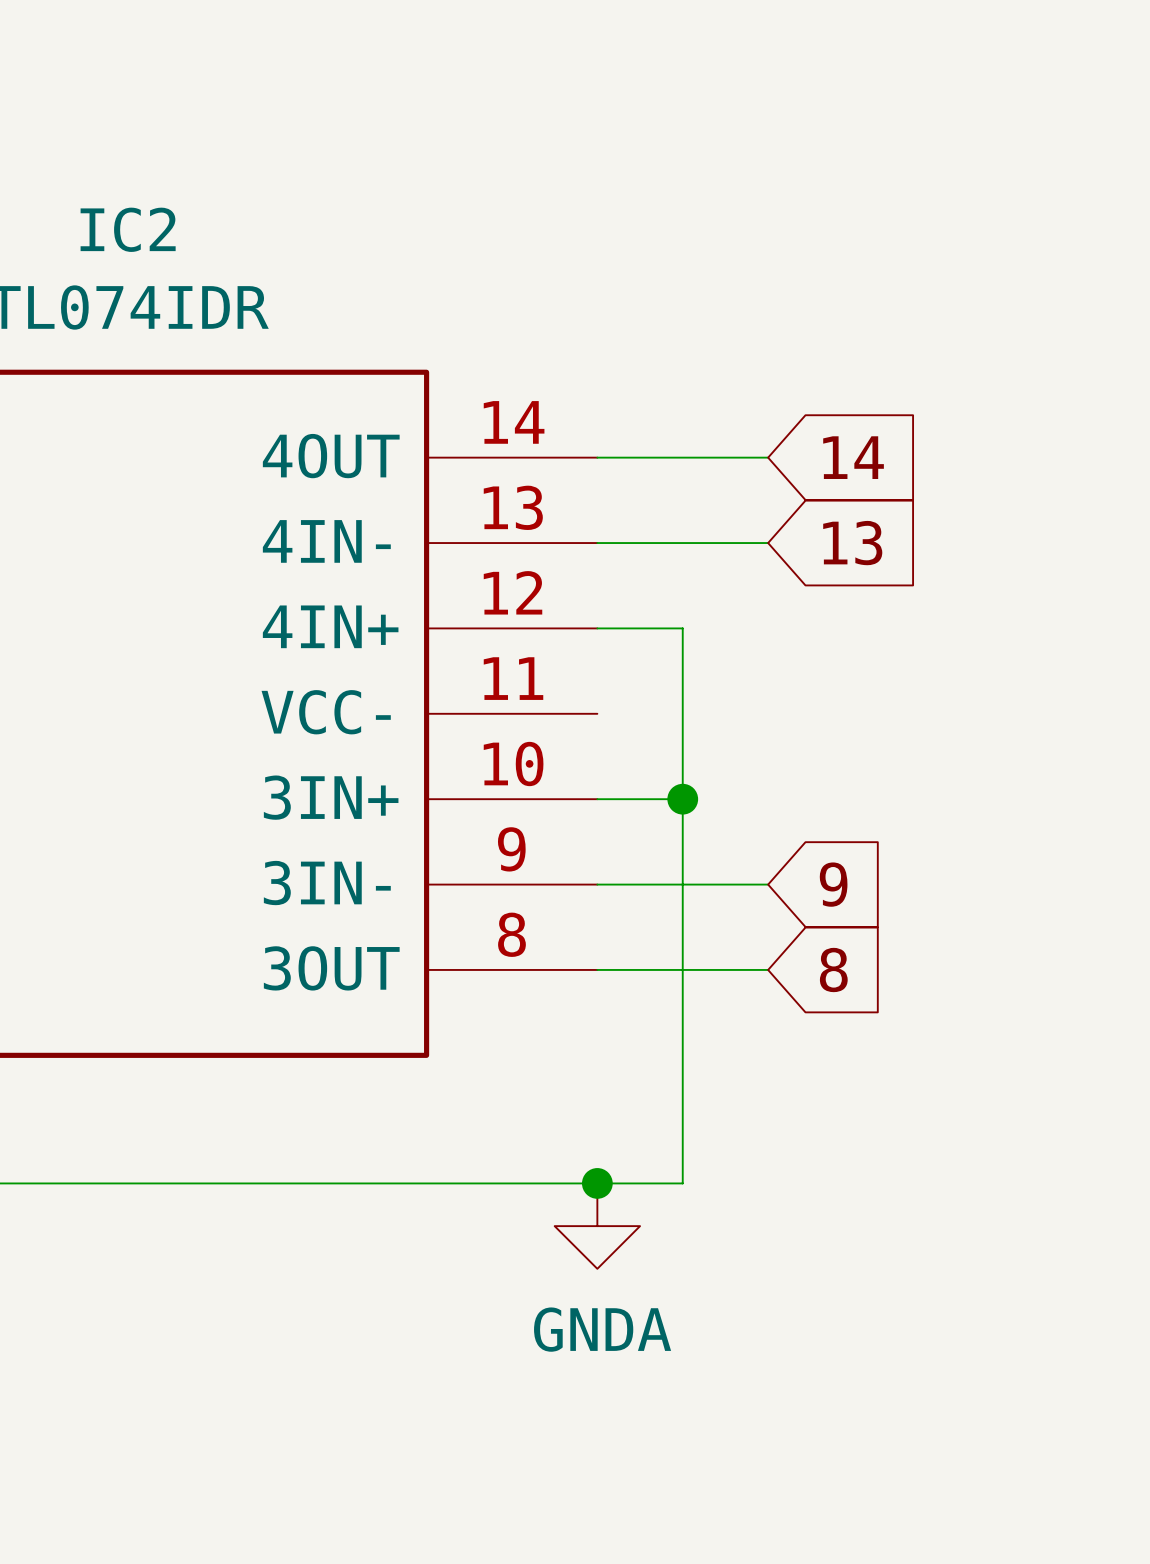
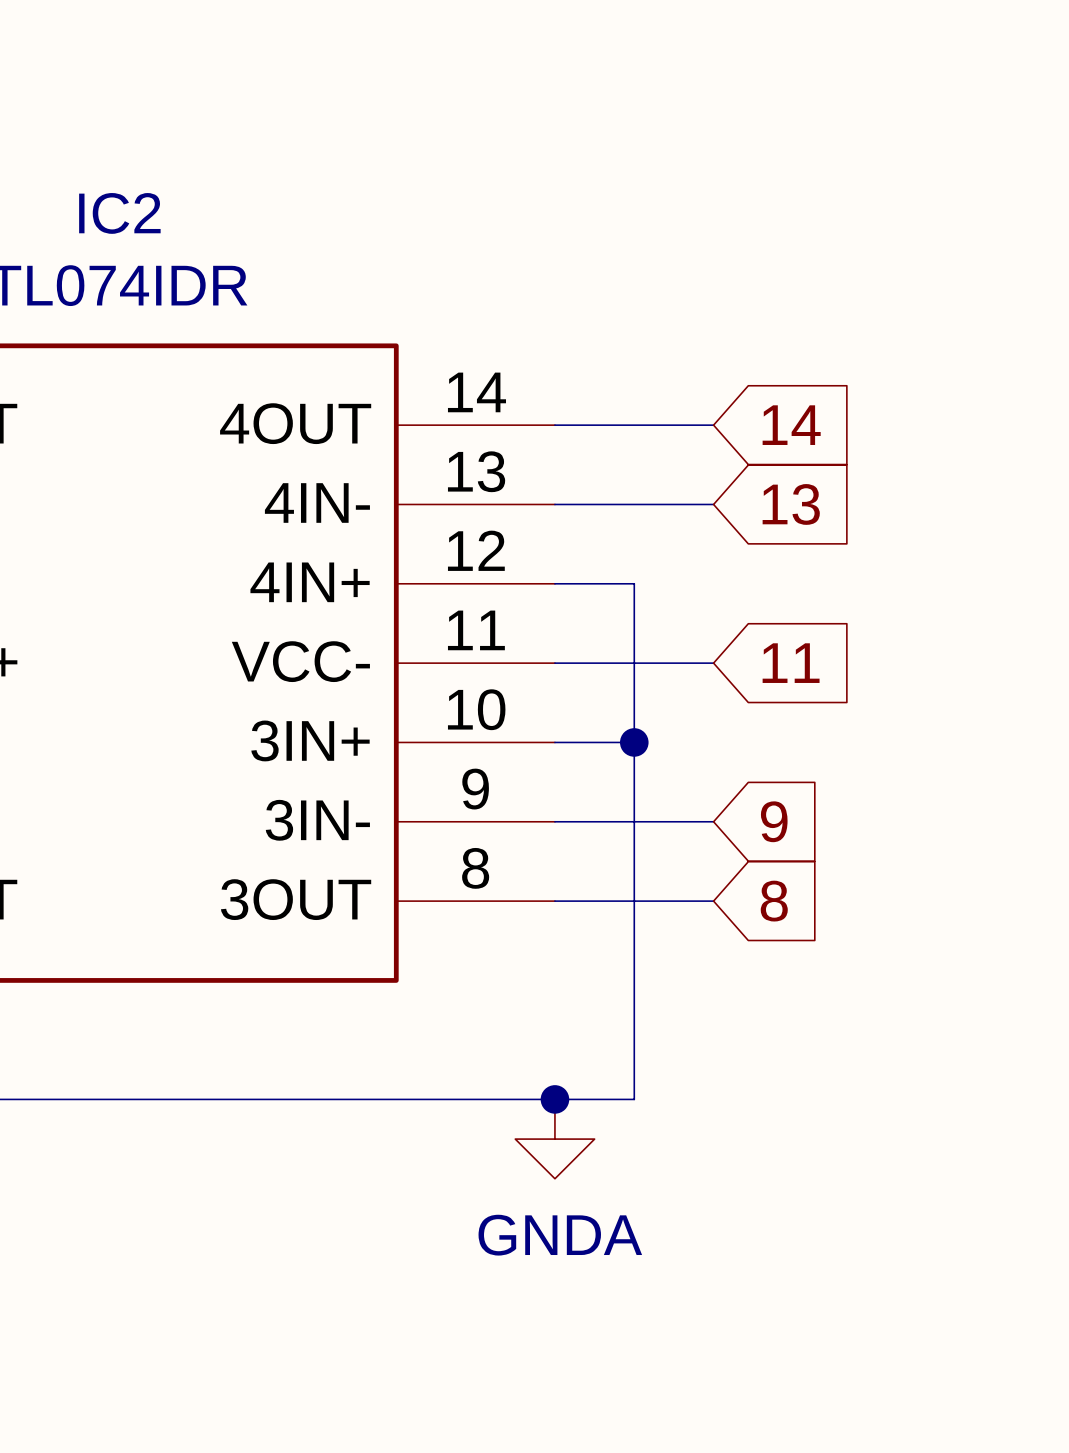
wire: none -> (554, 663) (713, 663)
global label: none -> 11 (791, 663)

